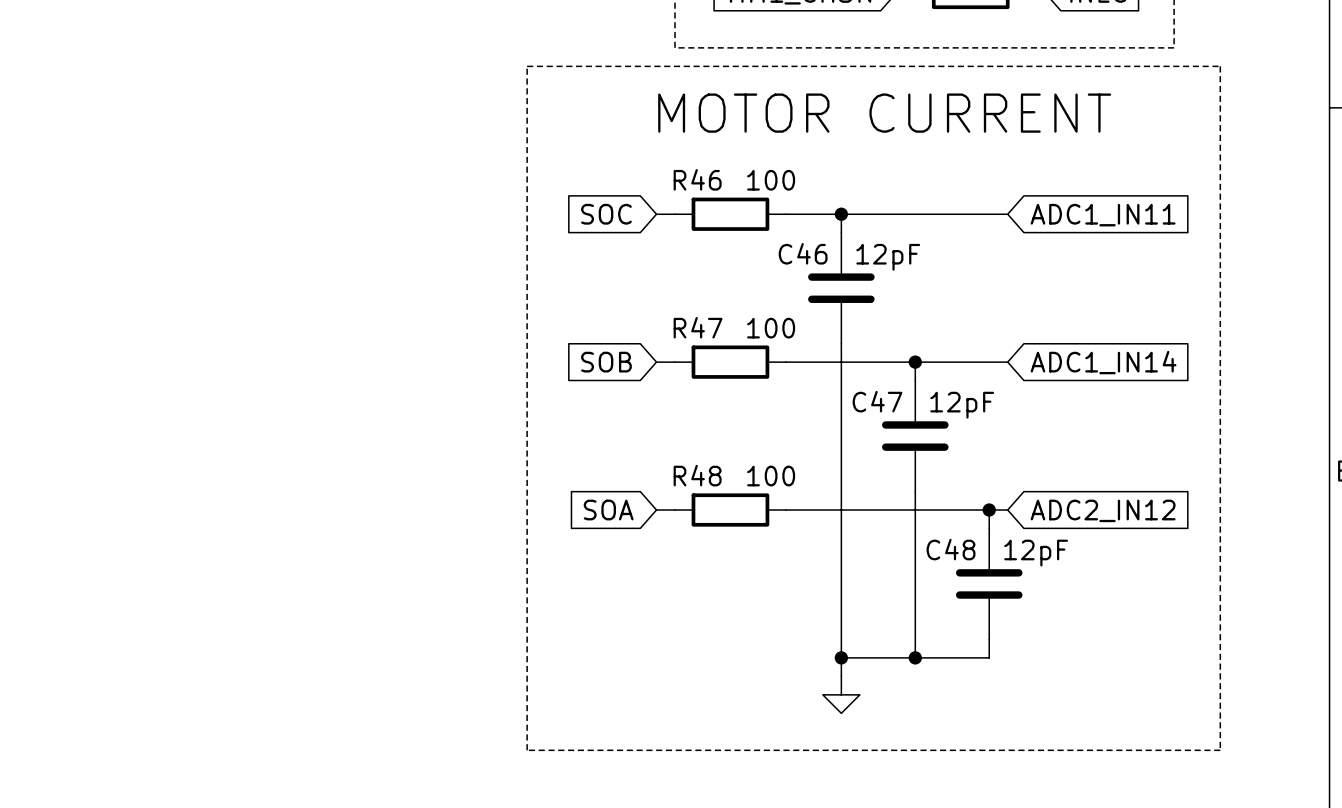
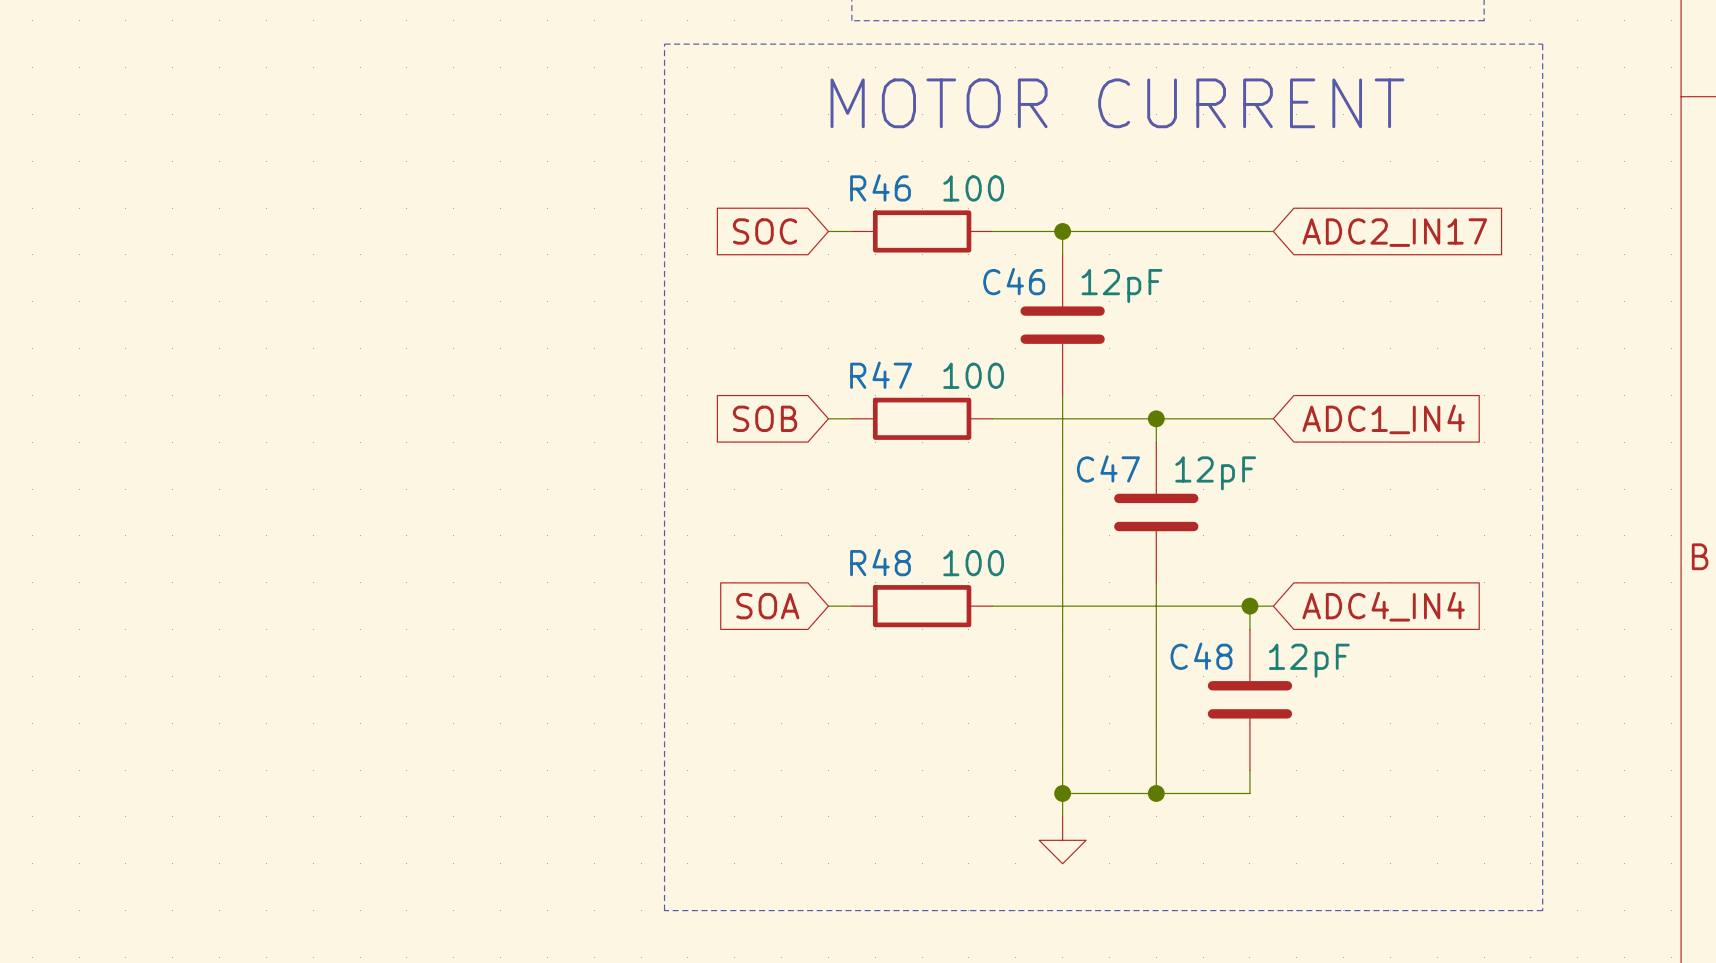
global label: ADC1_IN11 (1103, 215) -> ADC2_IN17 (1394, 232)
global label: ADC1_IN14 (1103, 362) -> ADC1_IN4 (1383, 419)
global label: ADC2_IN12 (1103, 510) -> ADC4_IN4 (1383, 606)

